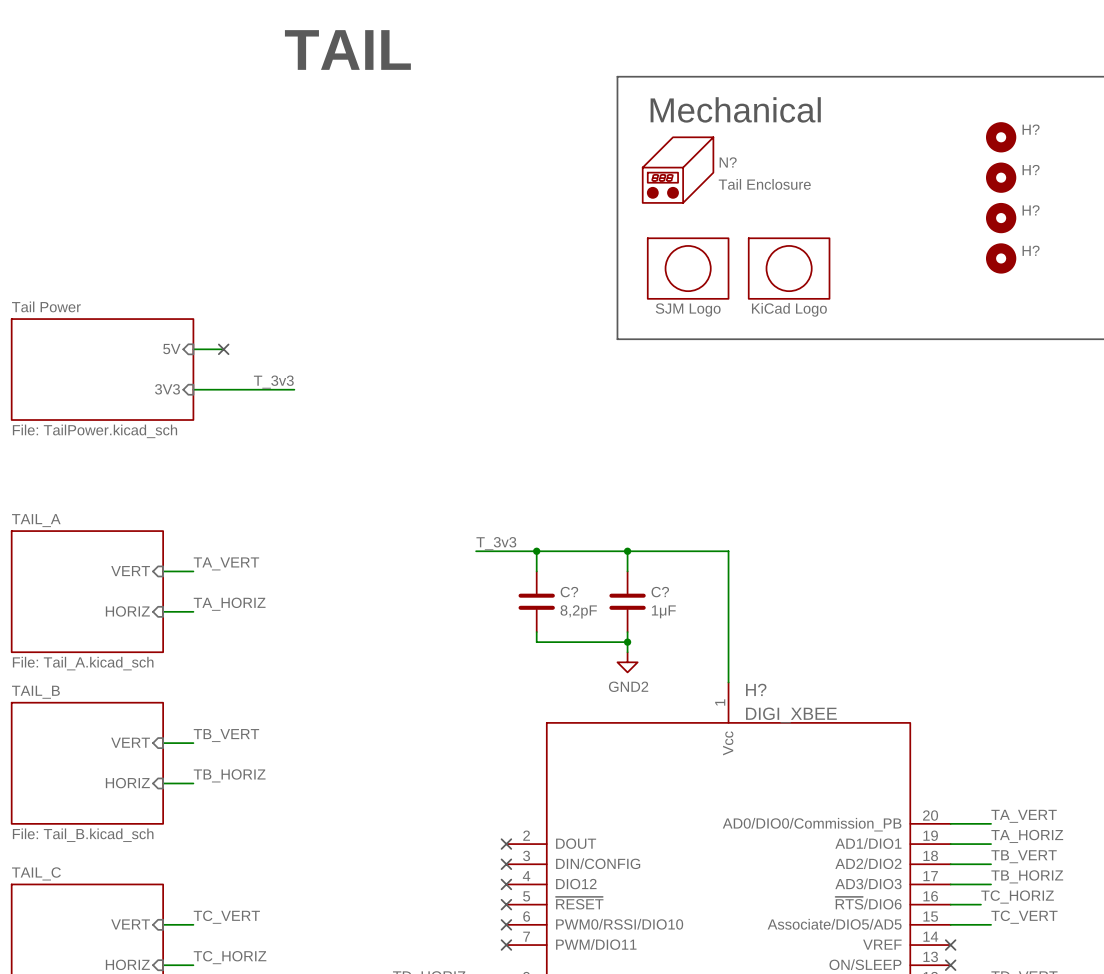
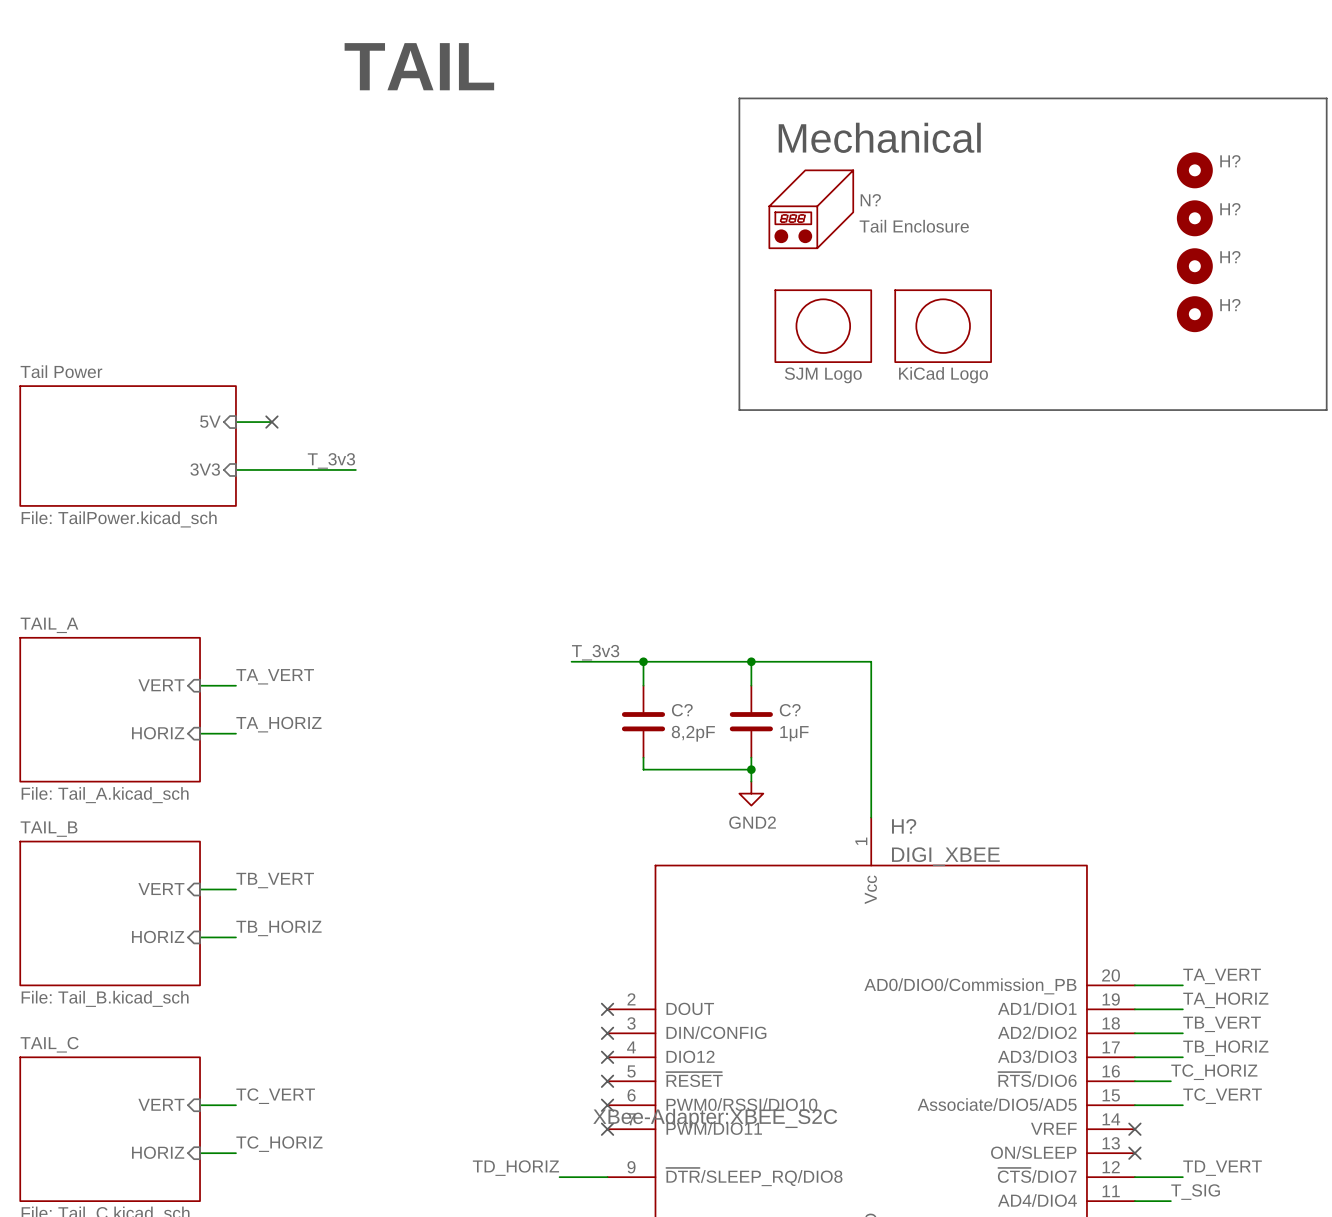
H? text: none -> XBee-Adapter:XBEE_S2C (715, 1118)

